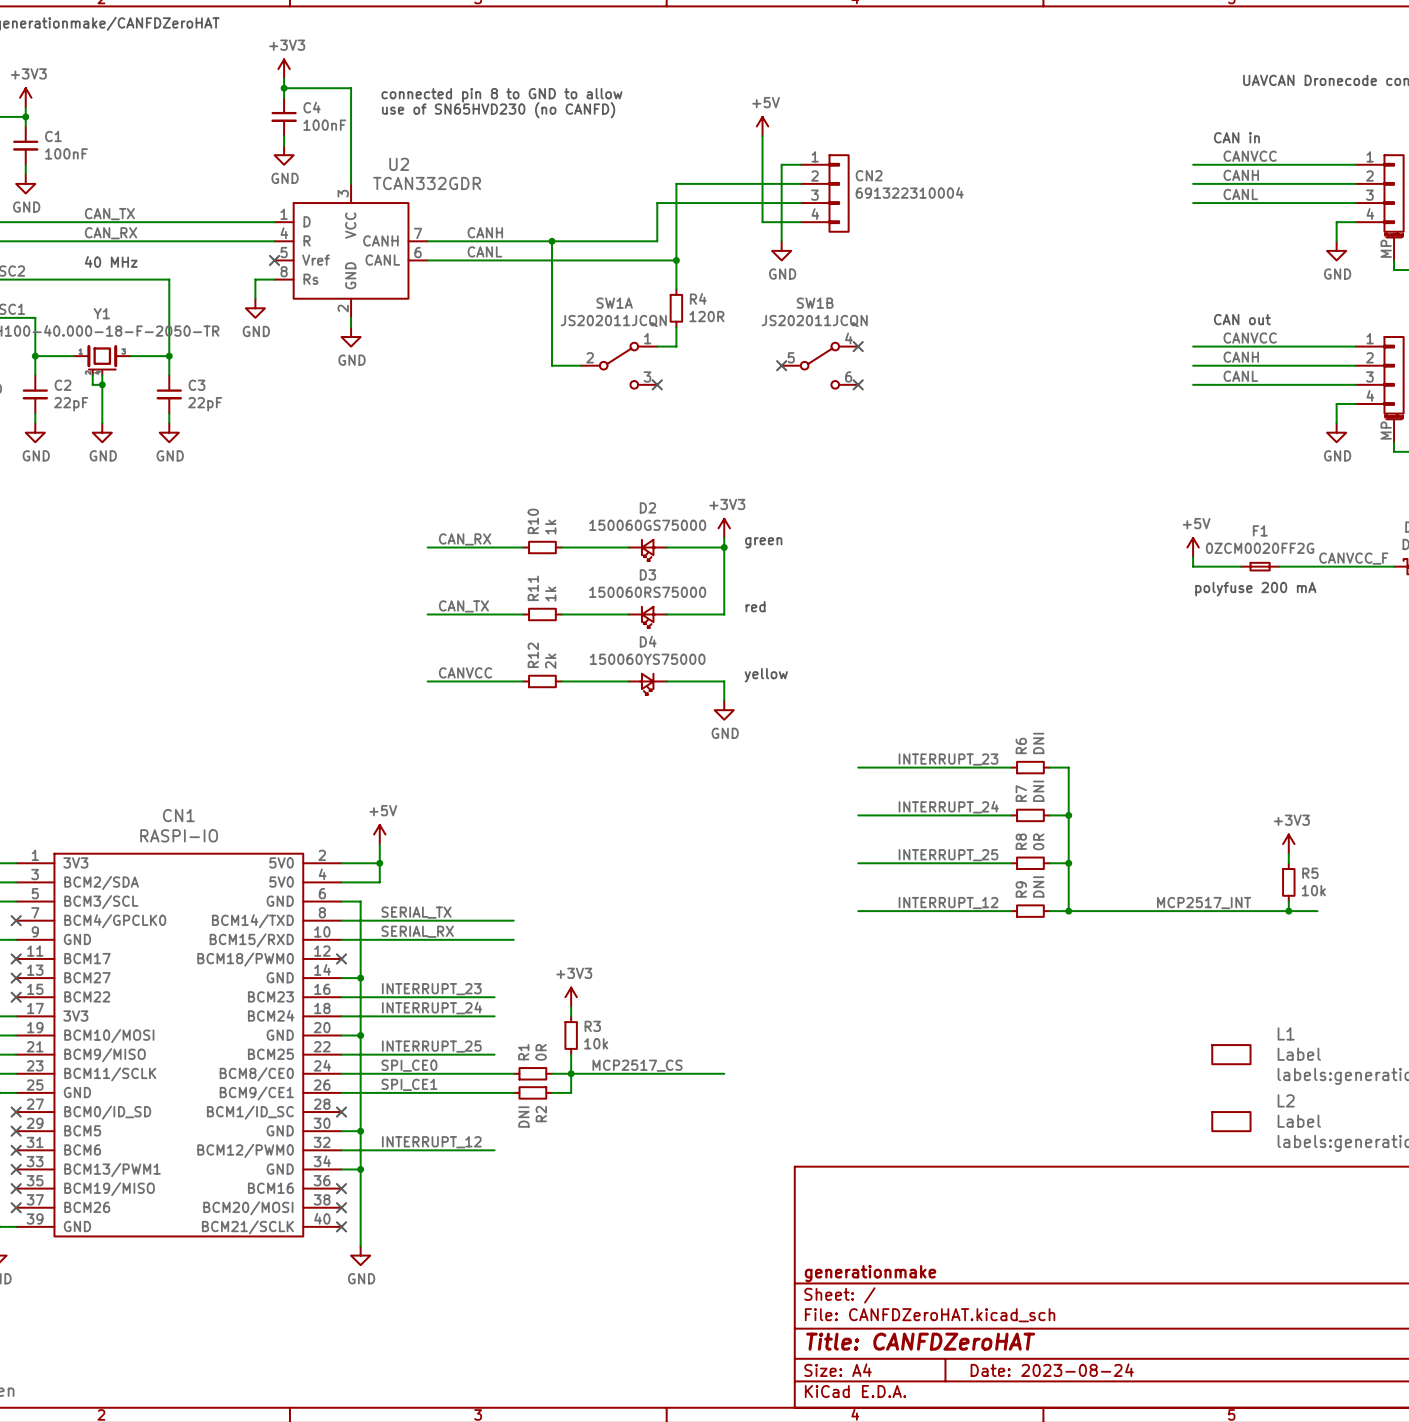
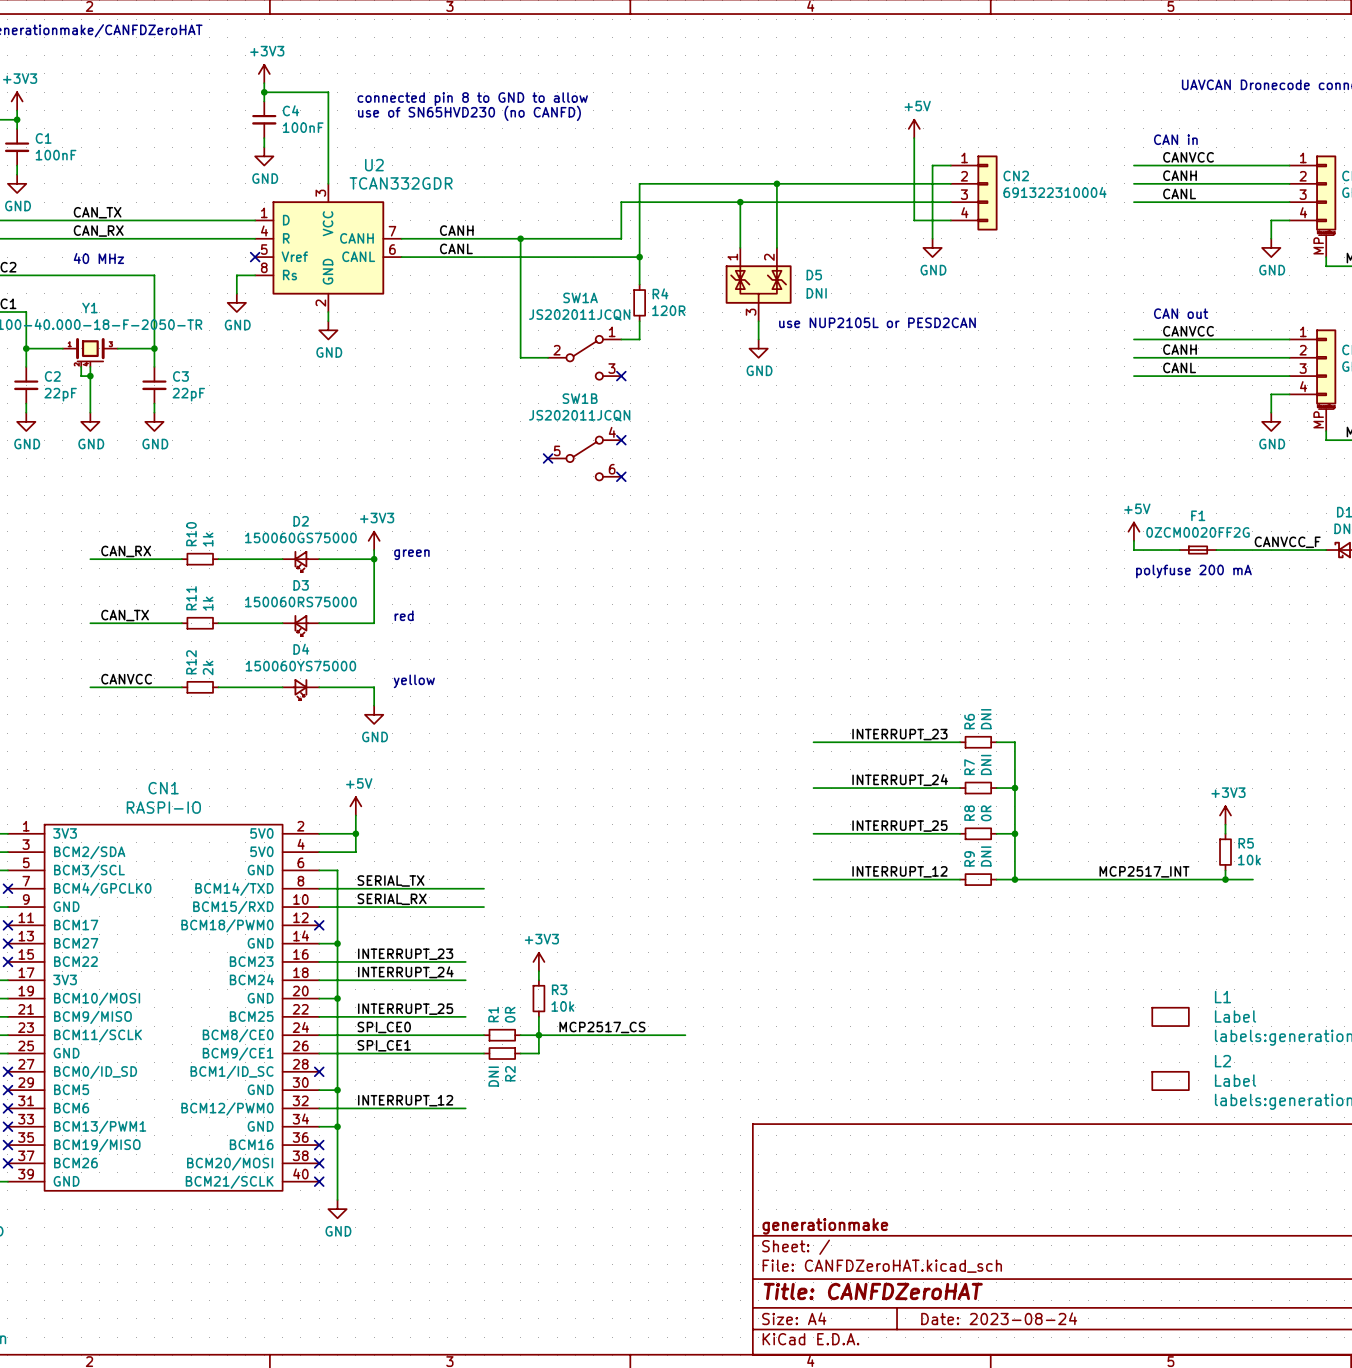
power symbol: +5V (762, 126) -> none
power symbol: none -> +5V (914, 128)
wire: (762, 136) (762, 222) (800, 222) -> none
wire: none -> (914, 138) (914, 220) (950, 220)
wire: (800, 164) (781, 164) (781, 203) -> none
wire: none -> (950, 165) (932, 165) (932, 238)
wire: none -> (758, 183) (950, 183)
wire: none -> (776, 183) (776, 247)
junction: none -> (776, 183)
CN2 position: (825, 193) -> (974, 192)
junction: none -> (740, 202)
wire: none -> (758, 202) (950, 202)
power symbol: GND (781, 250) -> none
power symbol: none -> GND (932, 247)
D5: none -> DNI (758, 284)
wire: none -> (758, 321) (758, 339)
text: none -> use NUP2105L or PESD2CAN (877, 322)
no-connect mark: (858, 346) -> none
power symbol: none -> GND (758, 348)
no-connect mark: (781, 365) -> none
SW1B position: (819, 365) -> (584, 458)
no-connect mark: (858, 384) -> none
no-connect mark: none -> (621, 440)
no-connect mark: none -> (548, 458)
no-connect mark: none -> (621, 476)
power symbol: +3V3 (724, 528) -> none
wire: (724, 537) (724, 614) (666, 614) -> none
label: CAN_RX (465, 539) -> none
text: green (763, 542) -> none
wire: (427, 547) (523, 547) -> none
R10 position: (542, 547) -> (200, 559)
wire: (561, 547) (628, 547) -> none
wire: (666, 547) (724, 547) -> none
junction: (724, 547) -> none
D2 position: (647, 549) -> (300, 561)
power symbol: none -> +3V3 (374, 540)
wire: none -> (374, 550) (374, 623) (319, 623)
label: none -> CAN_RX (126, 551)
text: none -> green (411, 554)
wire: none -> (90, 559) (181, 559)
wire: none -> (218, 559) (282, 559)
wire: none -> (319, 559) (374, 559)
junction: none -> (374, 559)
label: CAN_TX (463, 606) -> none
text: red (755, 606) -> none
wire: (427, 614) (523, 614) -> none
R11 position: (542, 614) -> (200, 623)
wire: (561, 614) (628, 614) -> none
D3 position: (647, 616) -> (300, 625)
label: none -> CAN_TX (125, 615)
text: none -> red (404, 615)
wire: none -> (90, 623) (181, 623)
wire: none -> (218, 623) (282, 623)
label: CANVCC (465, 672) -> none
text: yellow (766, 675) -> none
wire: (427, 681) (523, 681) -> none
R12 position: (542, 681) -> (200, 687)
wire: (561, 681) (628, 681) -> none
wire: (666, 681) (724, 681) (724, 700) -> none
D4 position: (647, 683) -> (300, 689)
label: none -> CANVCC (126, 679)
text: none -> yellow (414, 681)
wire: none -> (90, 687) (181, 687)
wire: none -> (218, 687) (282, 687)
wire: none -> (319, 687) (374, 687) (374, 705)
power symbol: GND (724, 710) -> none
power symbol: none -> GND (374, 714)

